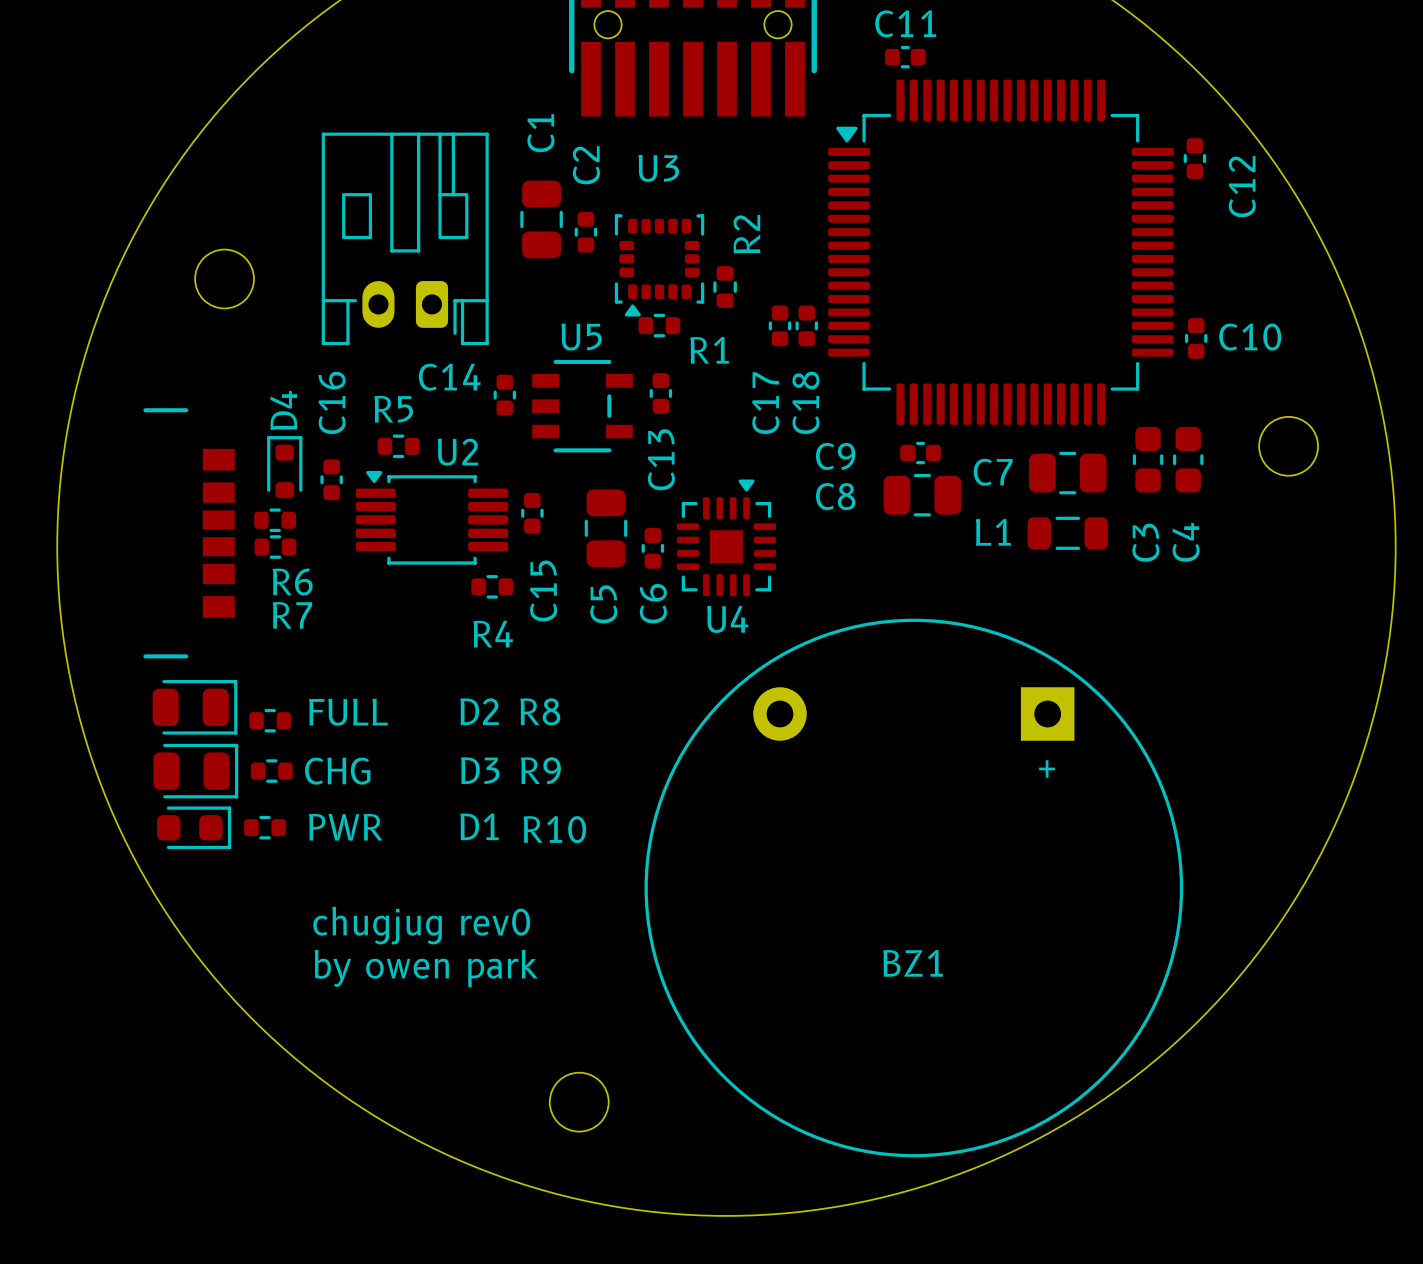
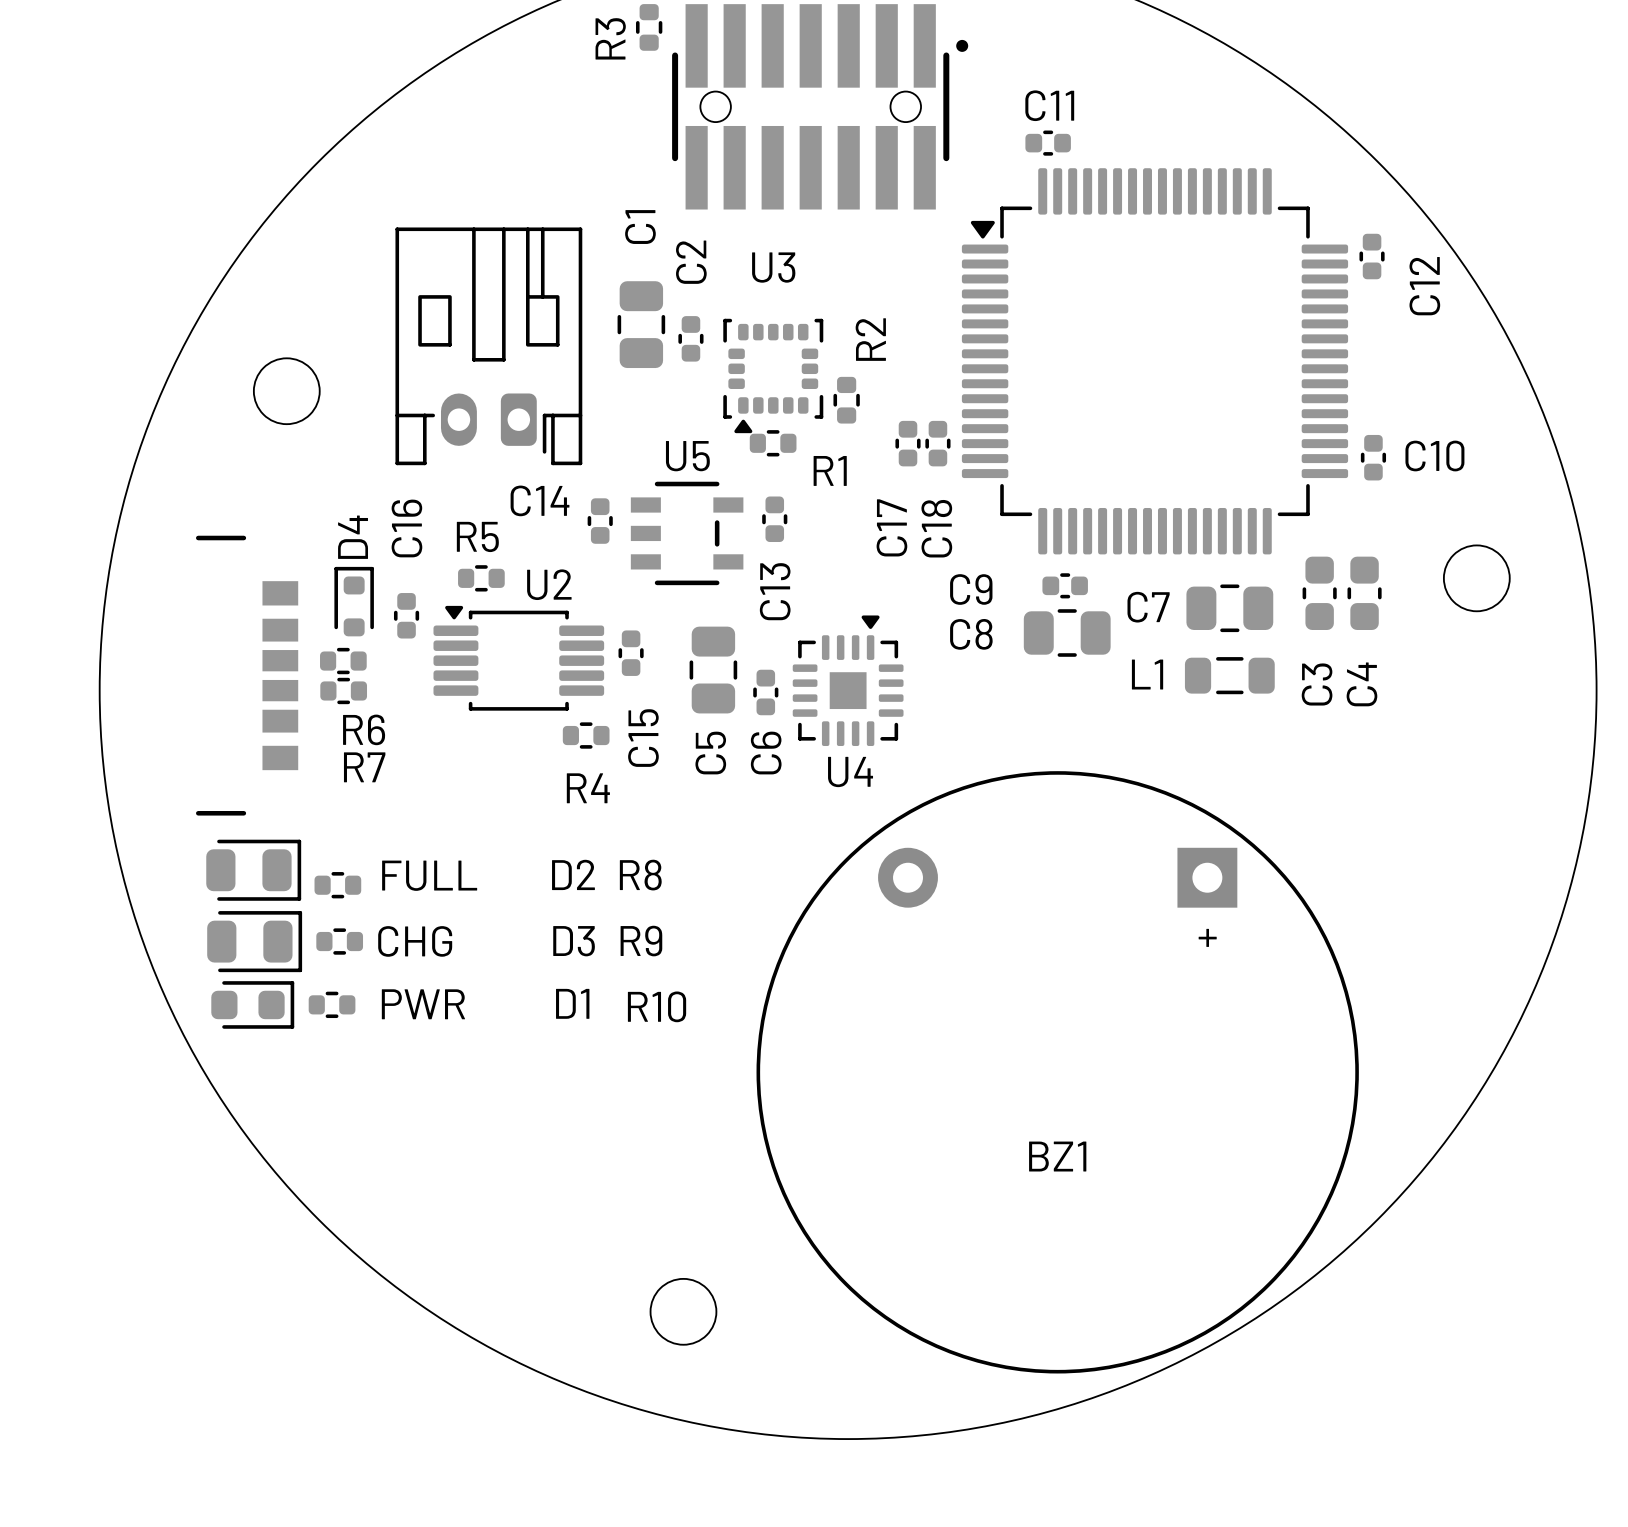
text: chugjug rev0 (421, 925) -> none
text: by owen park (426, 968) -> none

